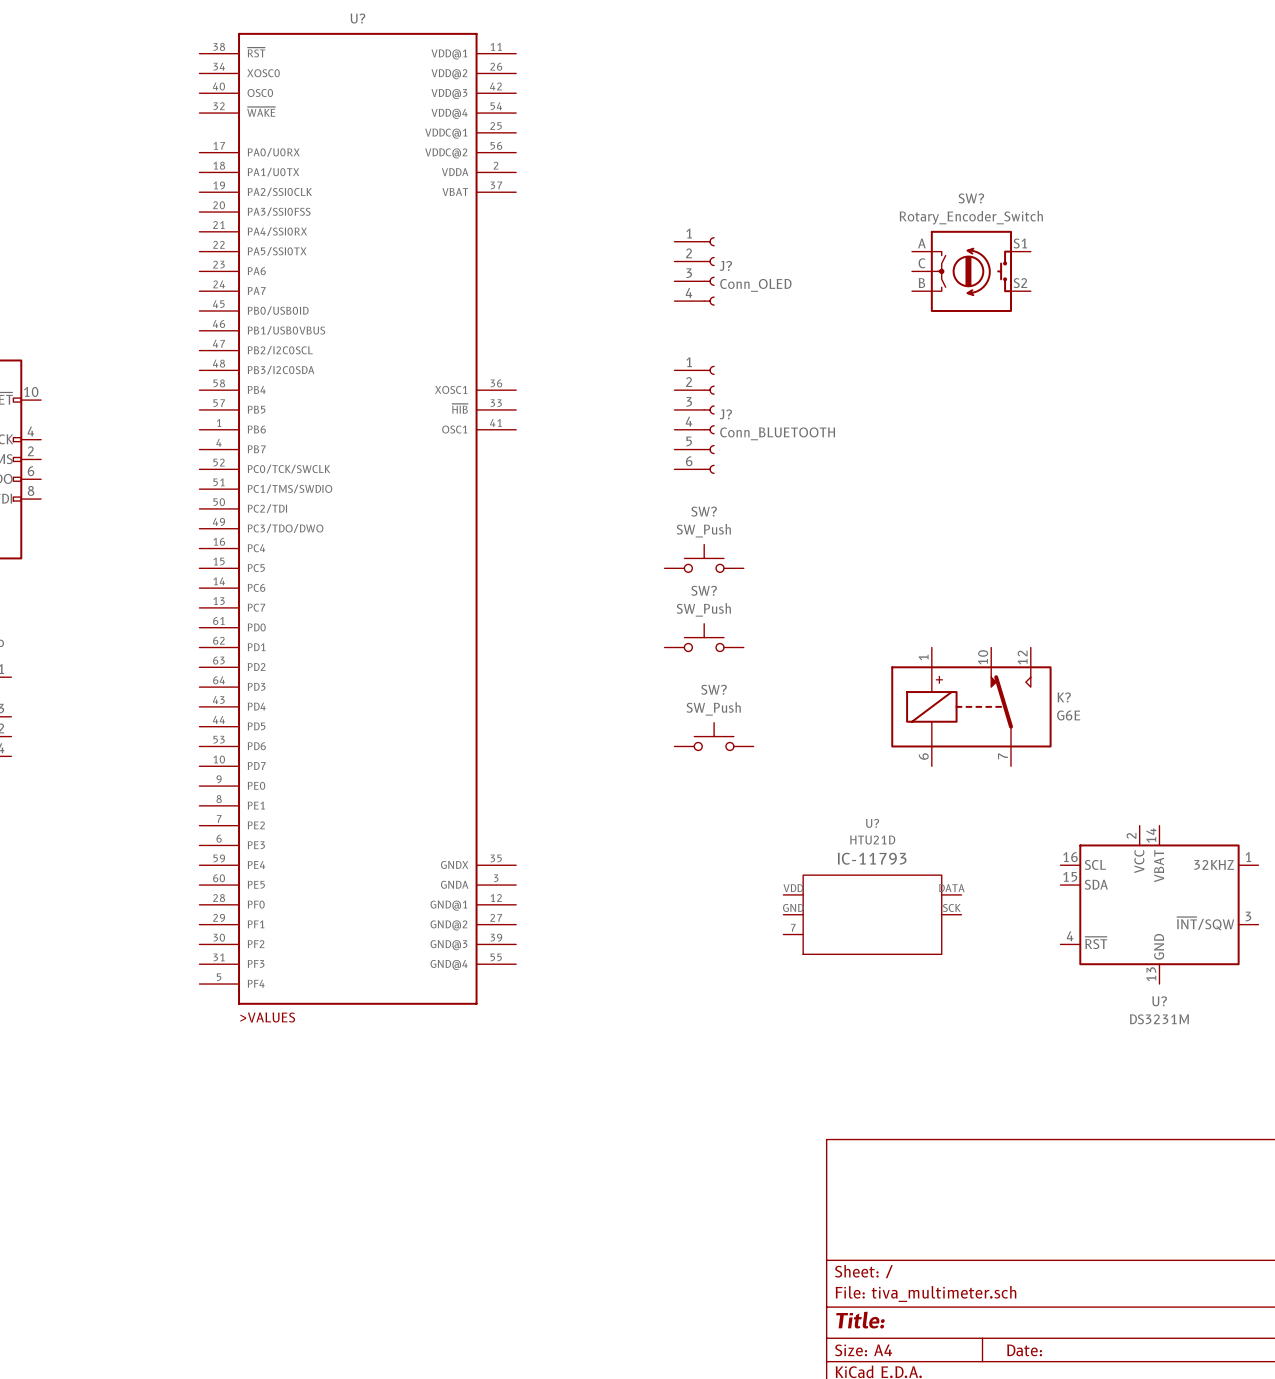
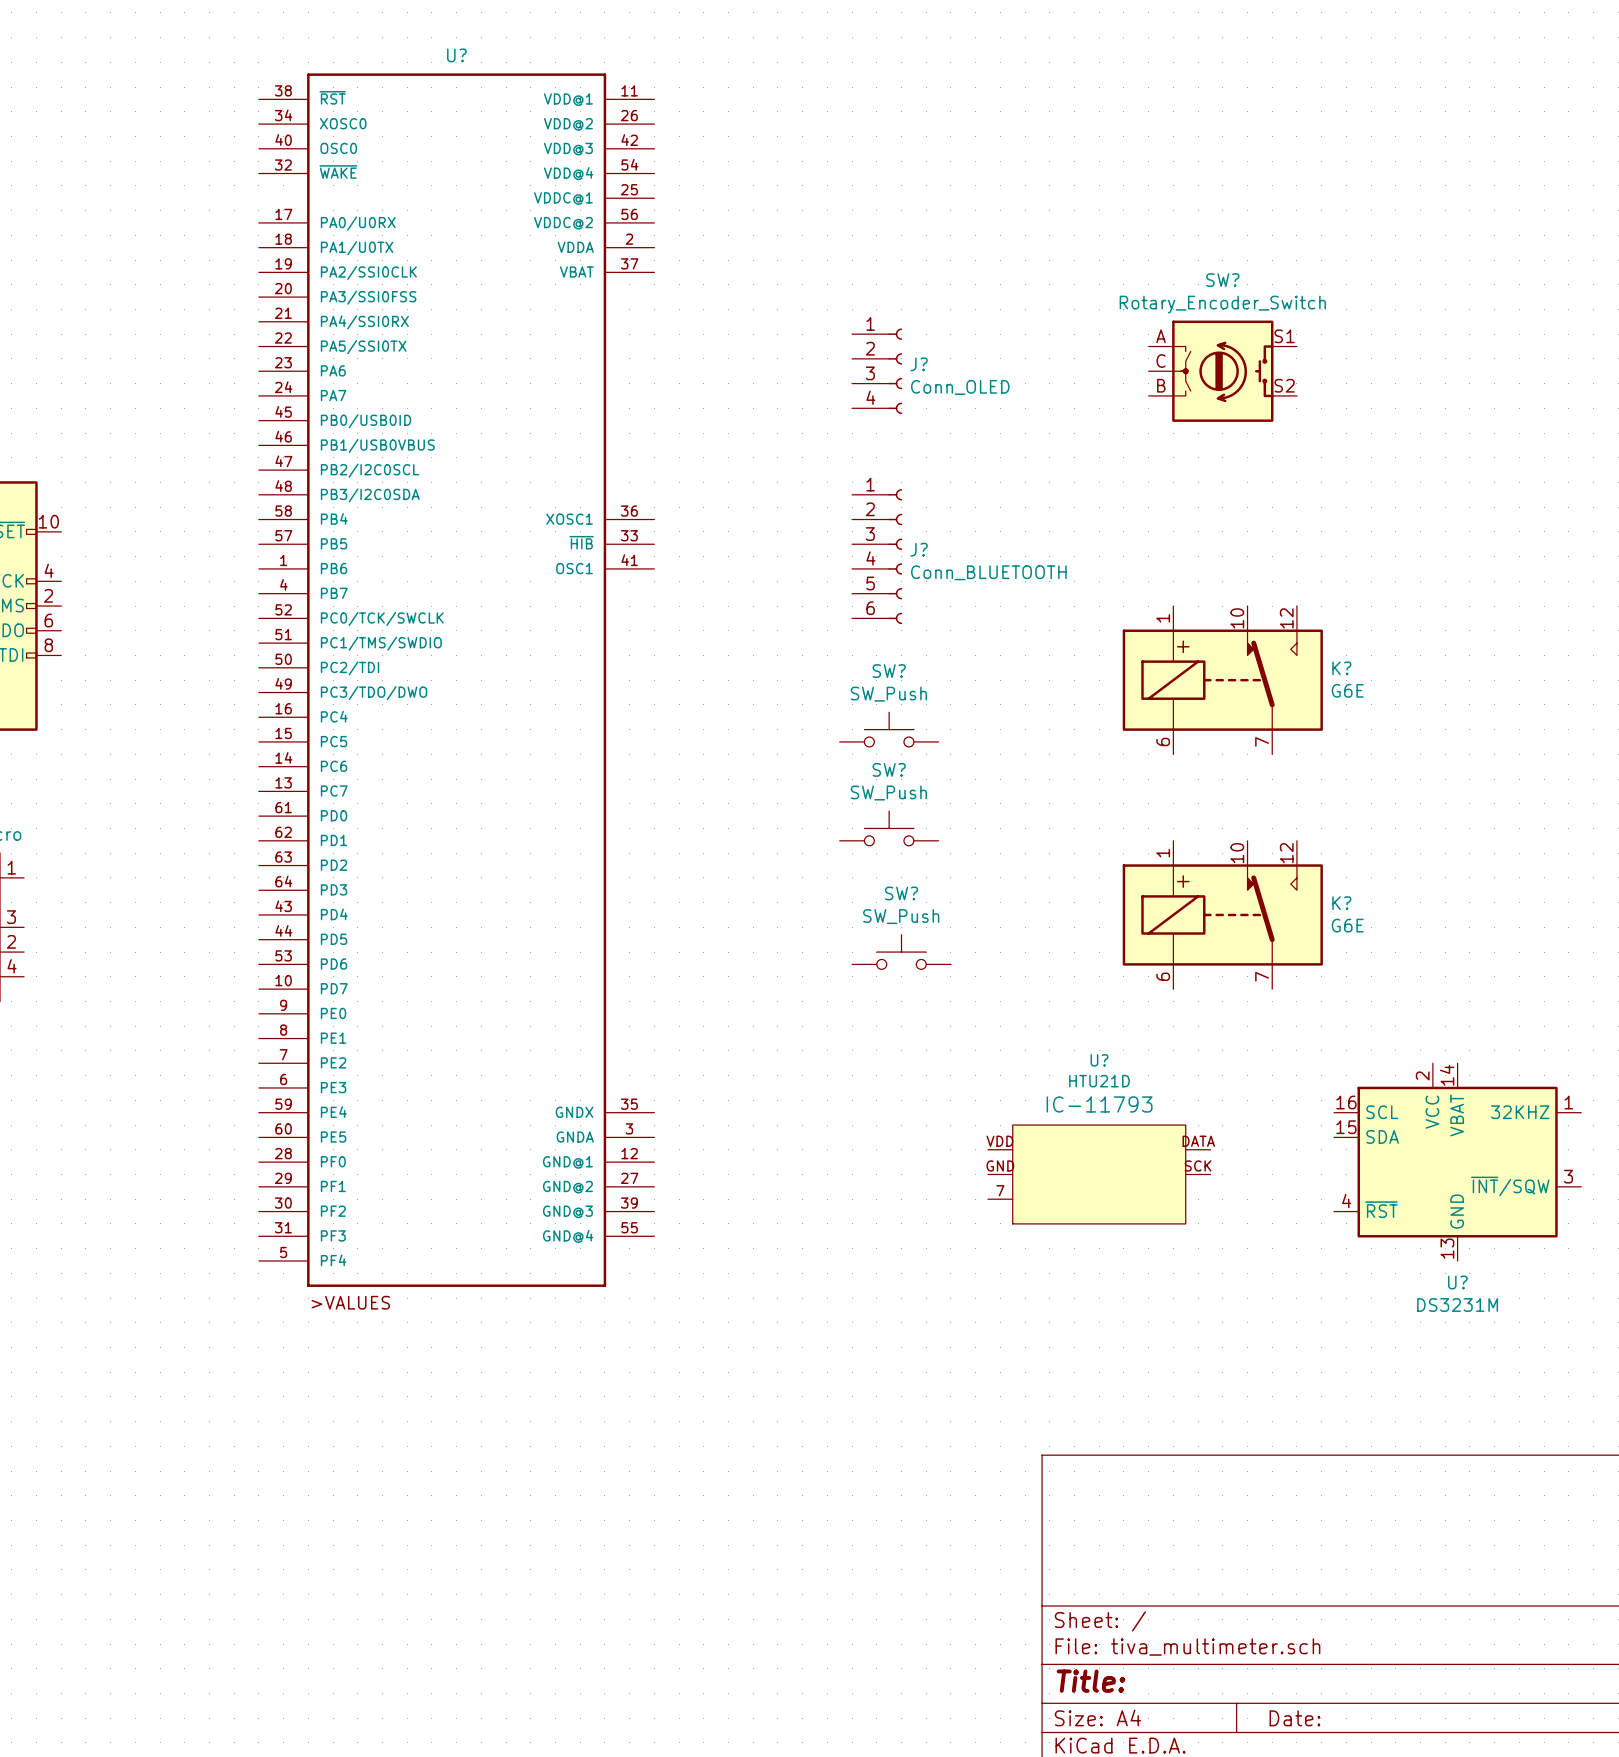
K?: none -> G6E (1222, 680)

